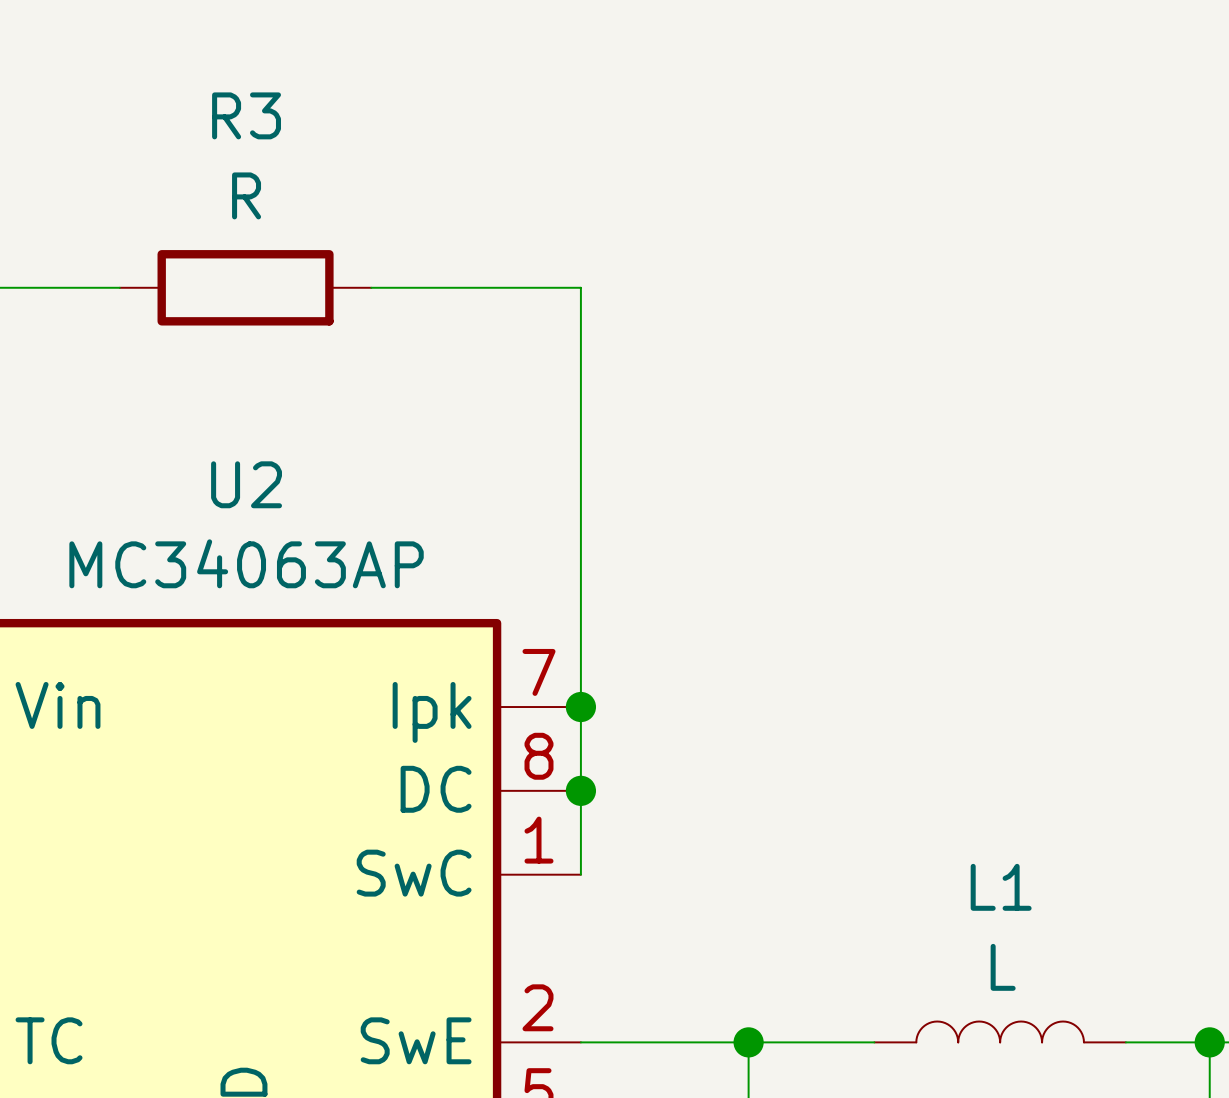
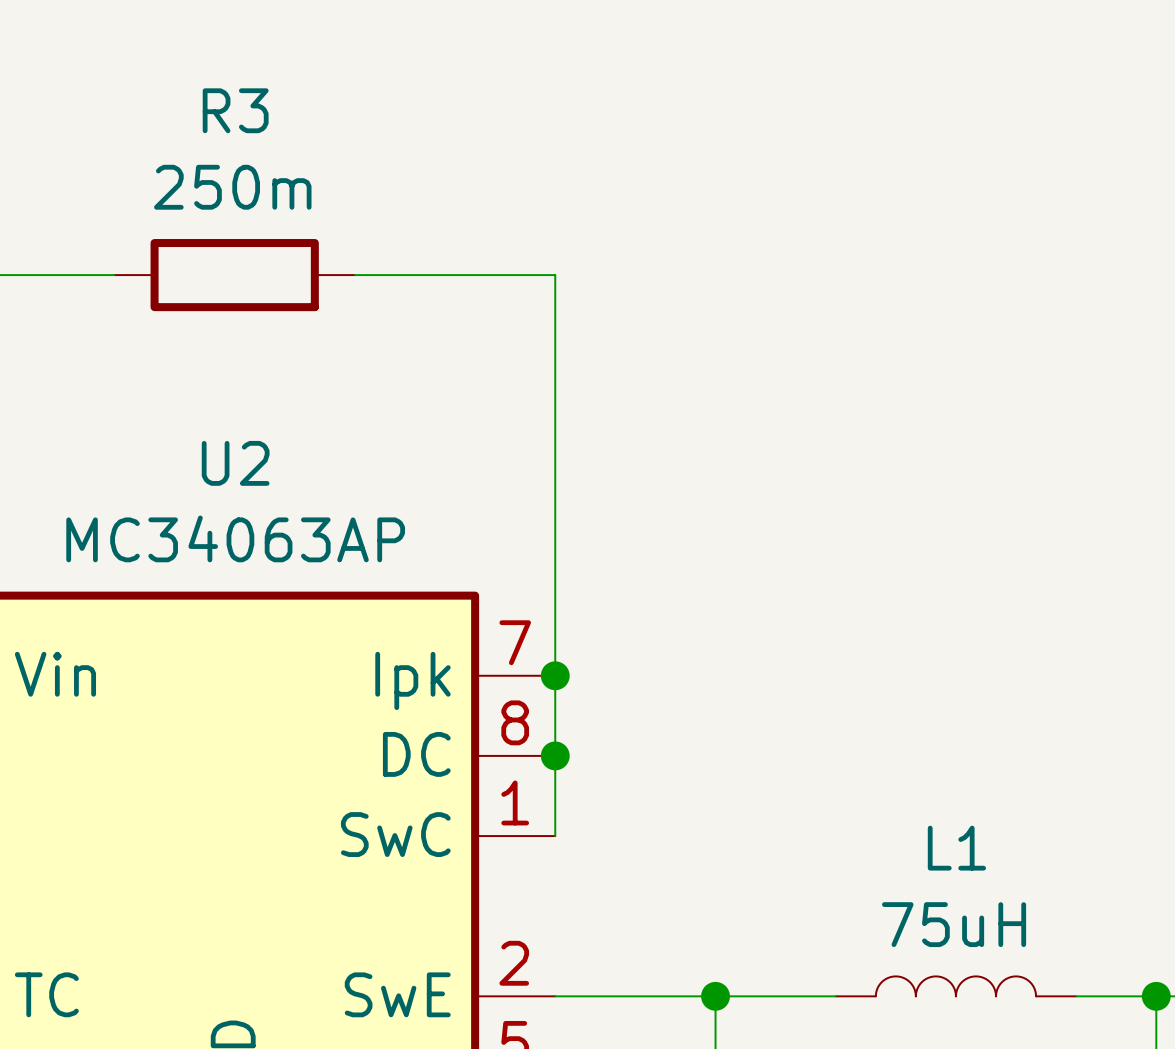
R3 value: R (246, 195) -> 250m (232, 187)
L1 value: L (1003, 967) -> 75uH (954, 924)

